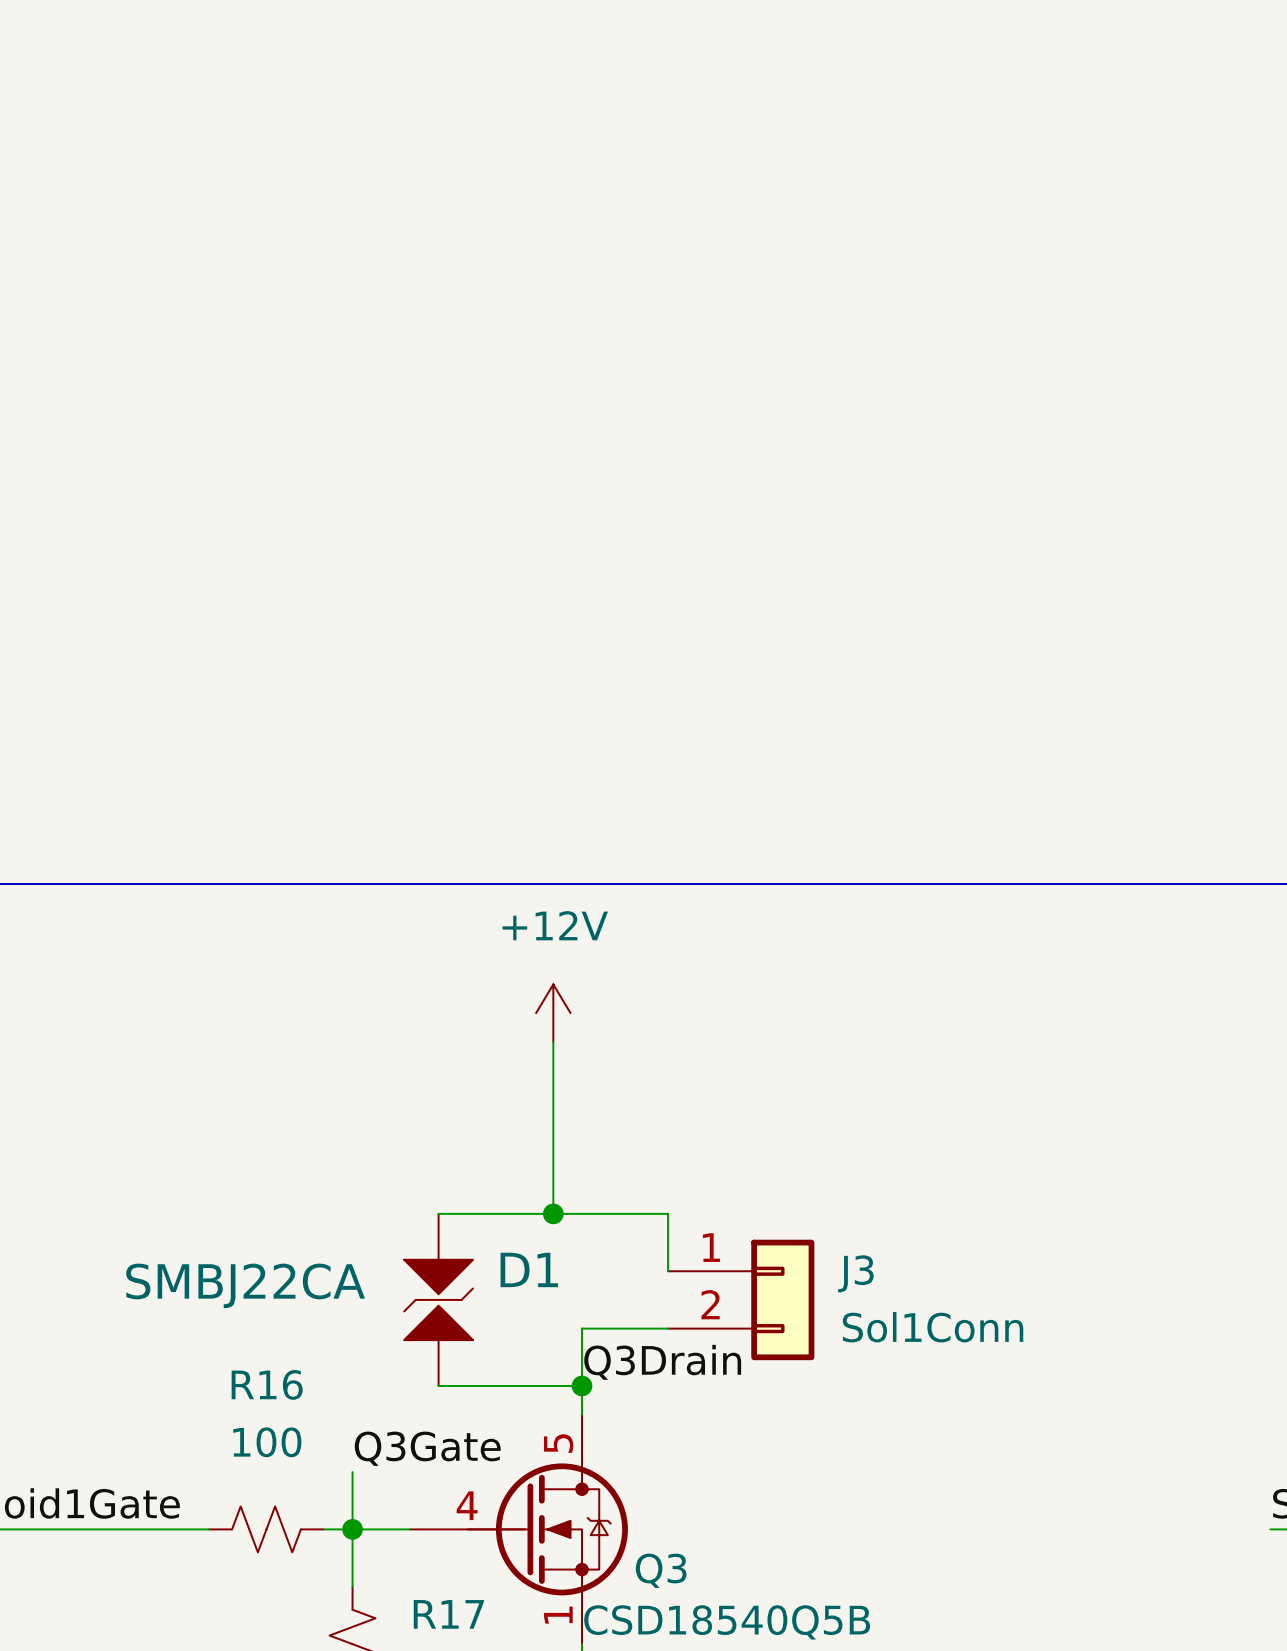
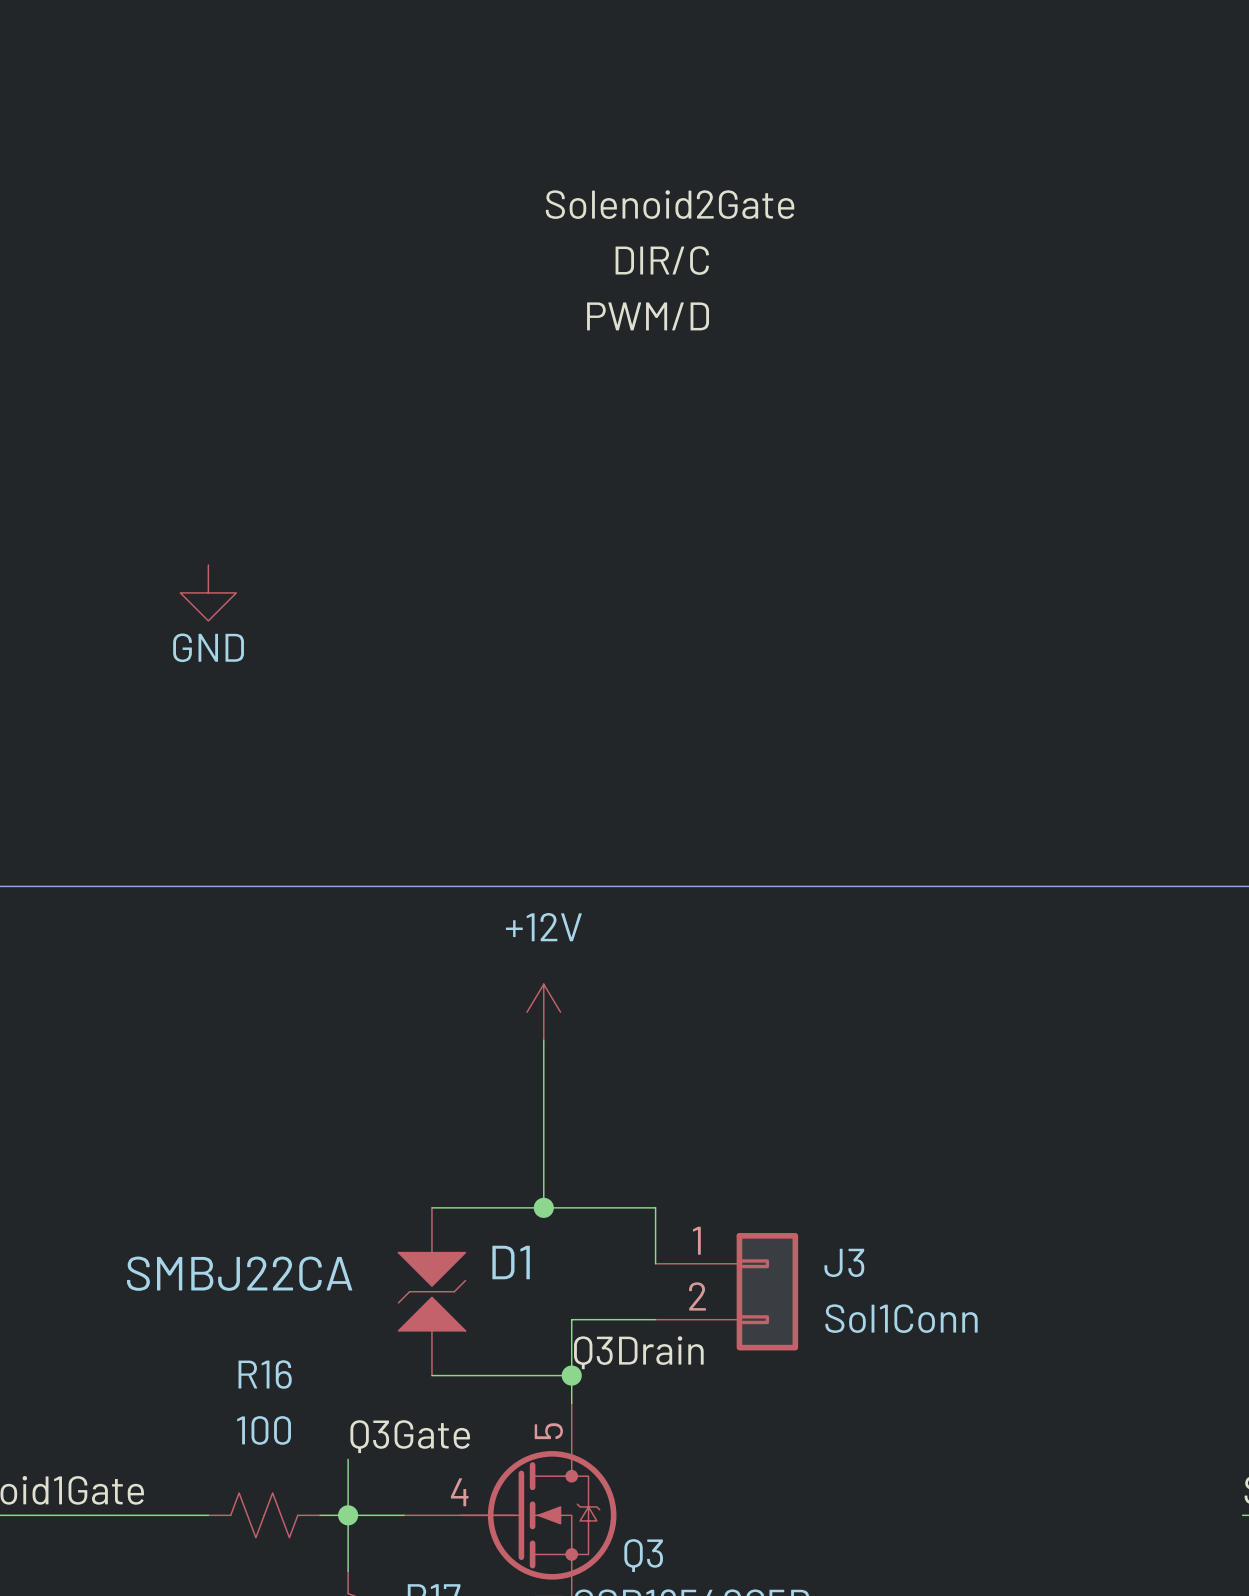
label: none -> Solenoid2Gate (670, 204)
label: none -> DIR/C (662, 260)
label: none -> PWM/D (648, 316)
power symbol: none -> GND (208, 592)

